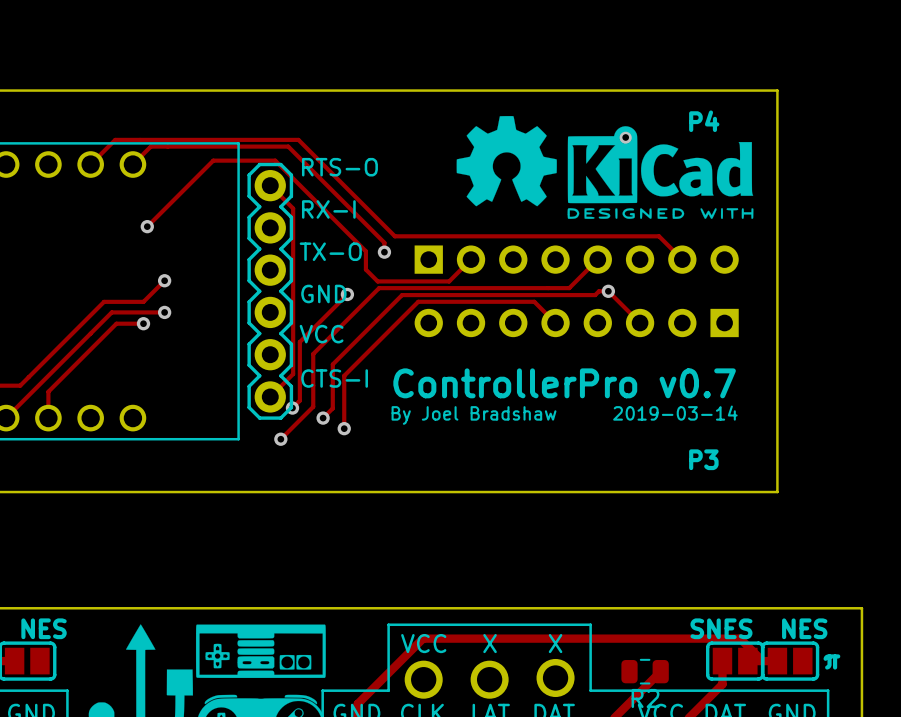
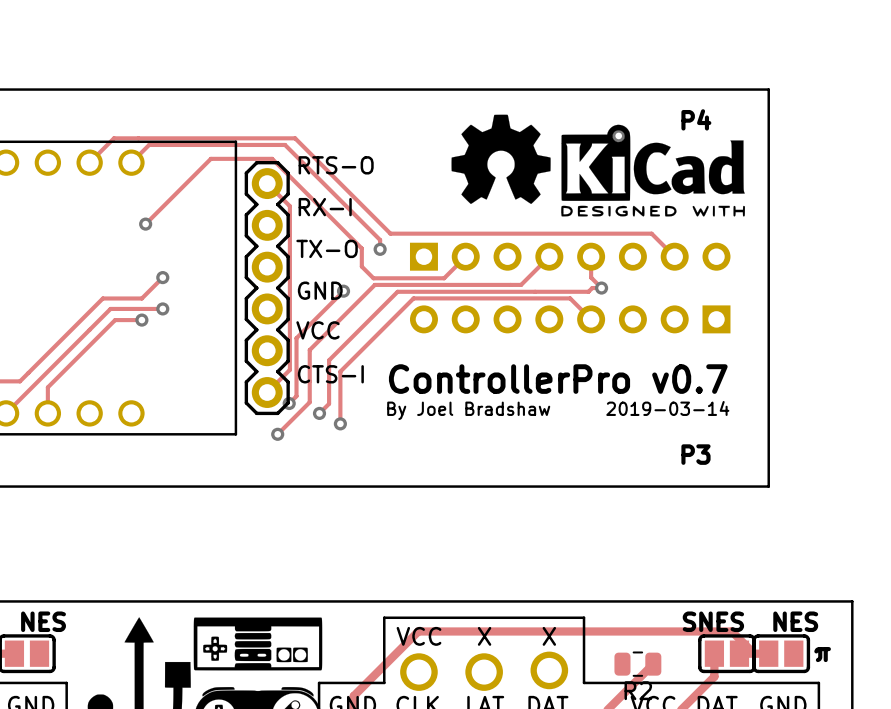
track: (597, 259) (569, 288) (527, 288) -> (549, 256) (521, 284)
track: (608, 291) (640, 323) -> (601, 288) (591, 277) (591, 256)
track: (534, 301) (555, 323) -> (528, 298) (570, 298) (591, 319)

